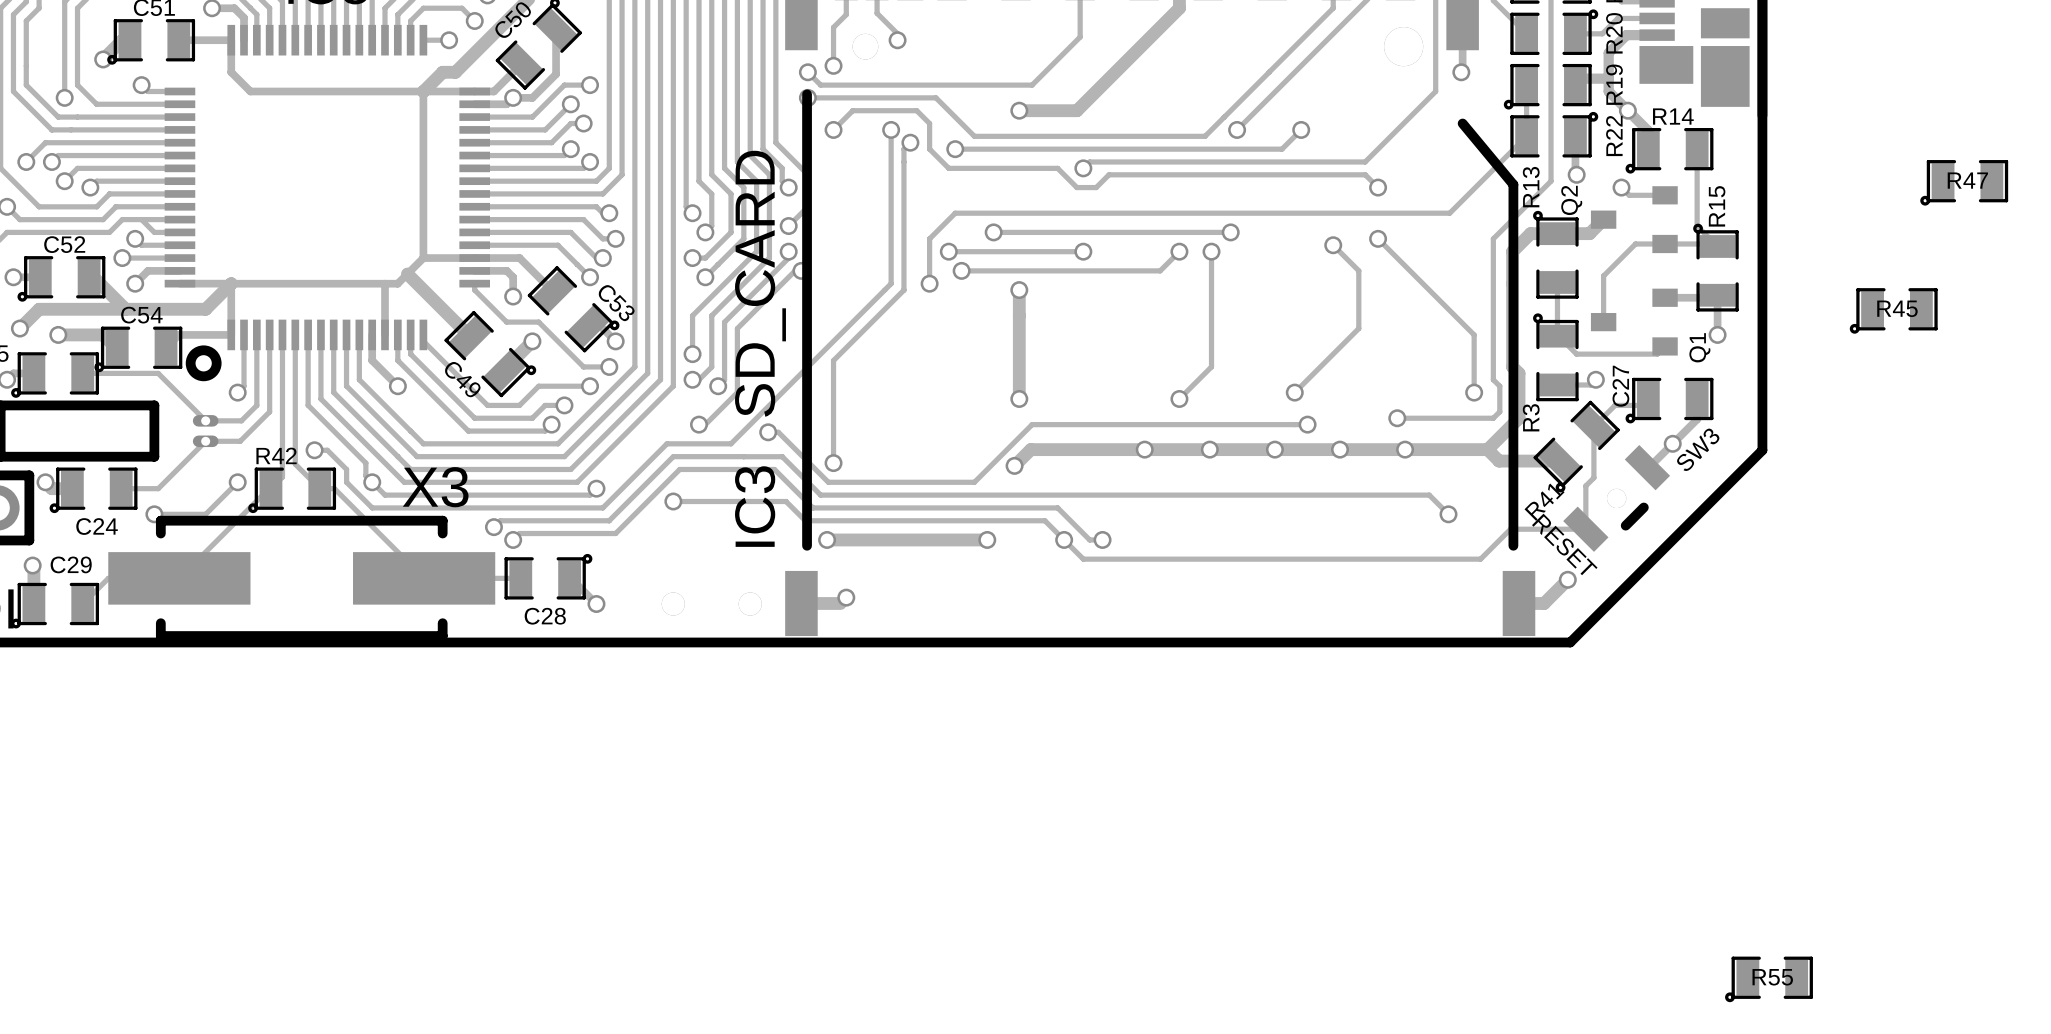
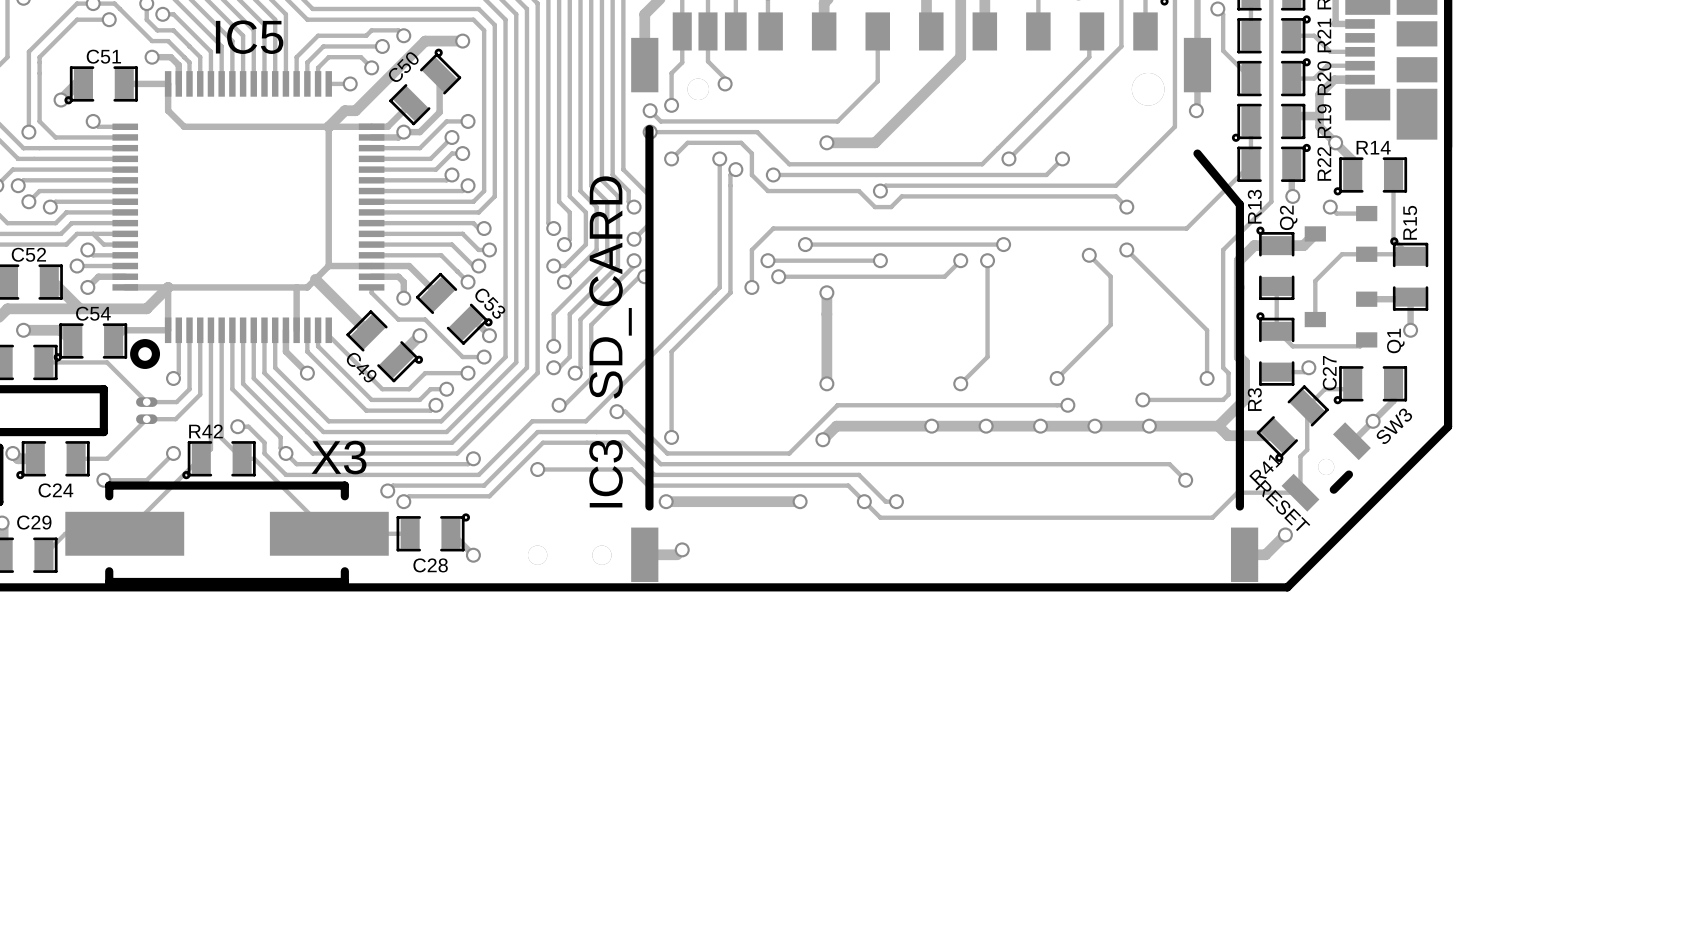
R47: (1964, 182) -> none
R45: (1893, 310) -> none
R55: (1769, 979) -> none

